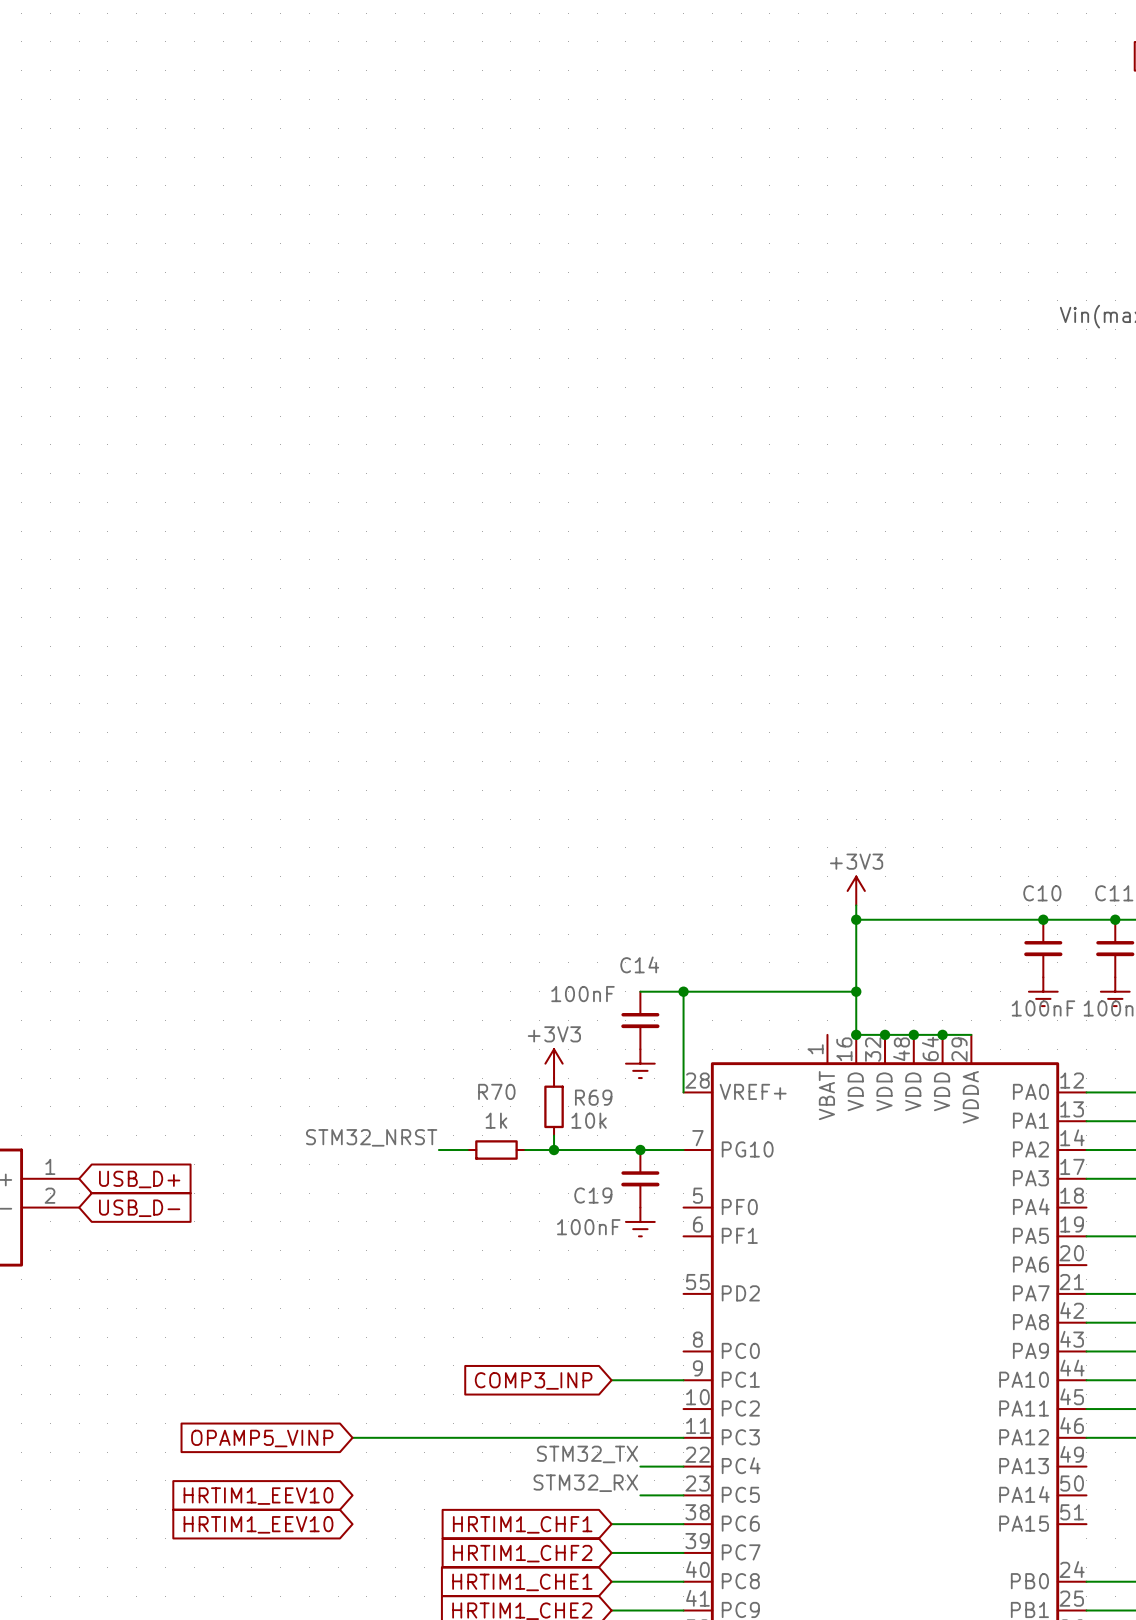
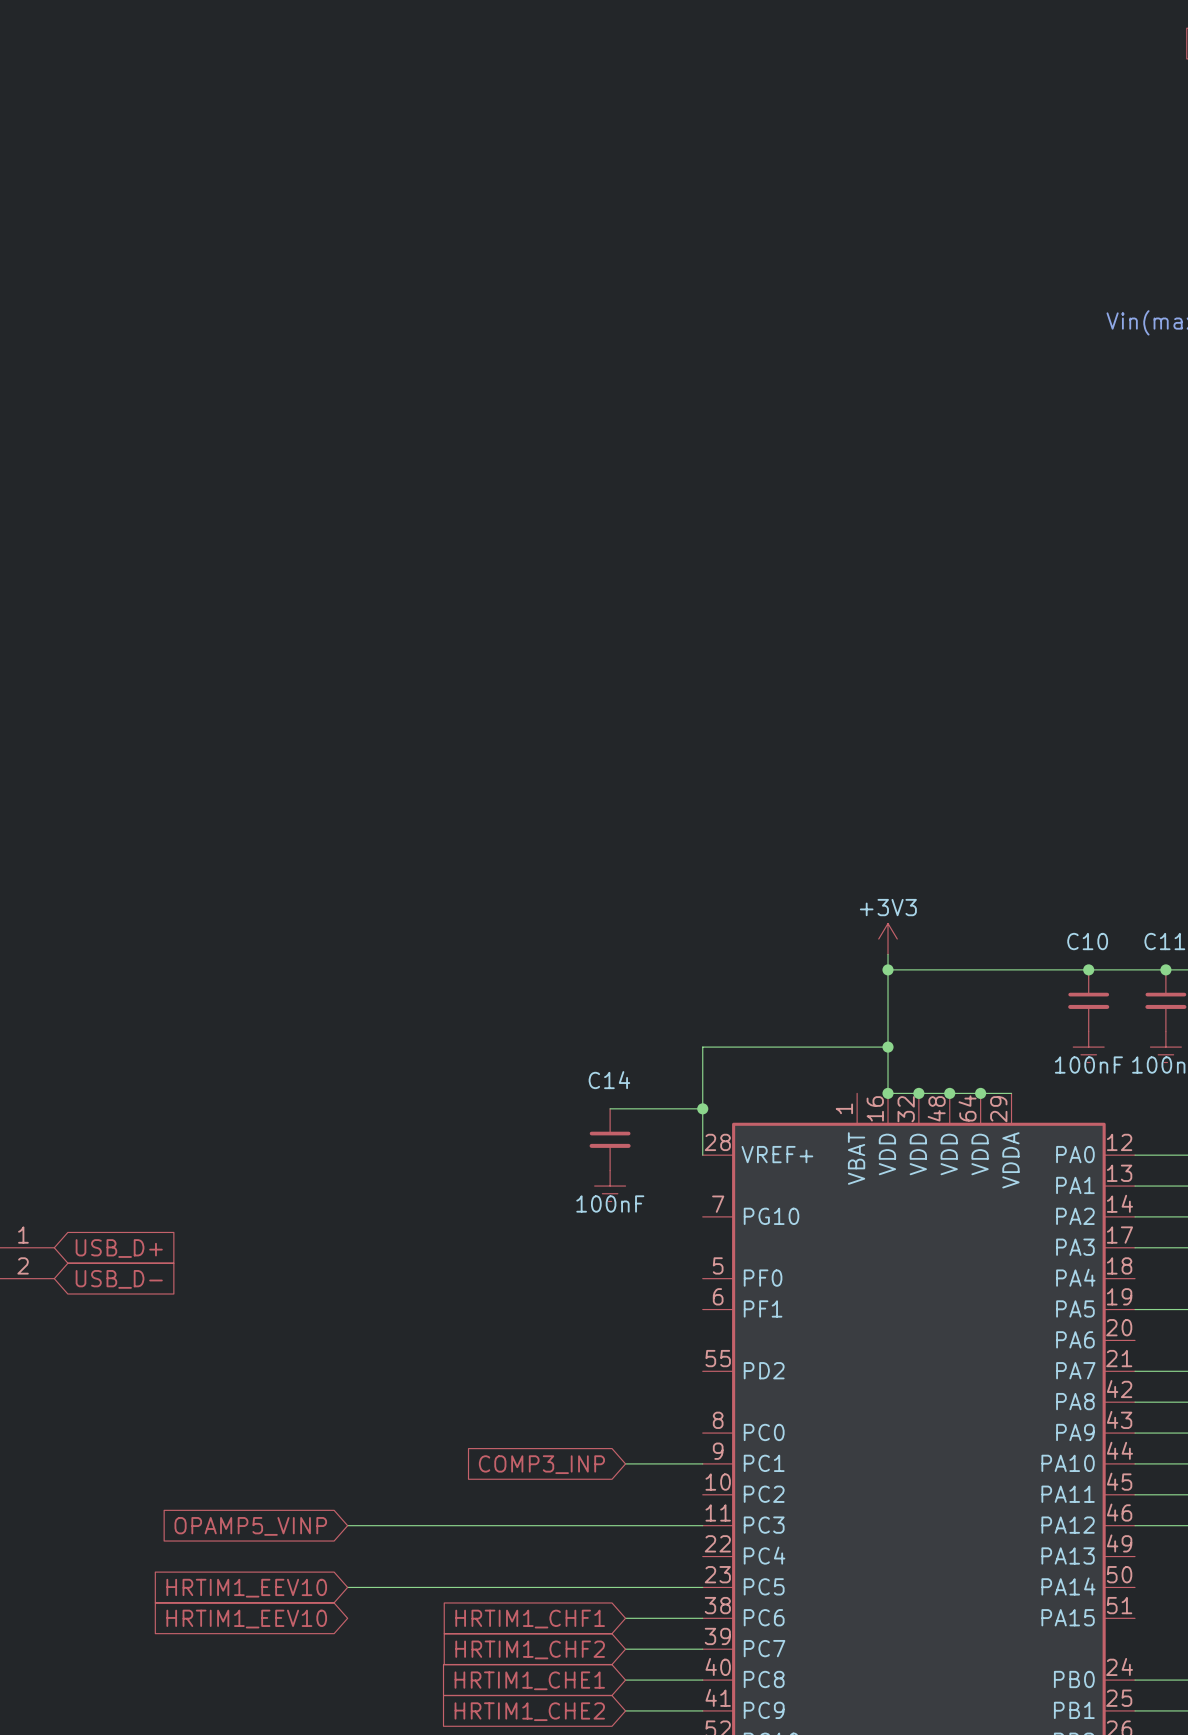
wire: (640, 991) (683, 991) -> none
junction: (683, 991) -> none
C14 value position: 100nF (582, 994) -> 100nF (610, 1203)
C14 position: (640, 1020) -> (610, 1139)
wire: none -> (610, 1108) (702, 1108)
junction: none -> (702, 1108)
power symbol: +3V3 (554, 1063) -> none
power symbol: (640, 1063) -> none
R69: 10k (554, 1106) -> none
power symbol: none -> (610, 1186)
wire: (554, 1135) (554, 1150) -> none
label: STM32_NRST (371, 1137) -> none
wire: (438, 1150) (467, 1150) -> none
R70: 1k (496, 1150) -> none
wire: (525, 1150) (683, 1150) -> none
junction: (554, 1150) -> none
junction: (640, 1150) -> none
C19: 100nF (640, 1178) -> none
power symbol: (640, 1221) -> none
label: STM32_TX (587, 1454) -> none
wire: (640, 1466) (683, 1466) -> none
label: STM32_RX (585, 1483) -> none
wire: none -> (347, 1587) (656, 1587)

